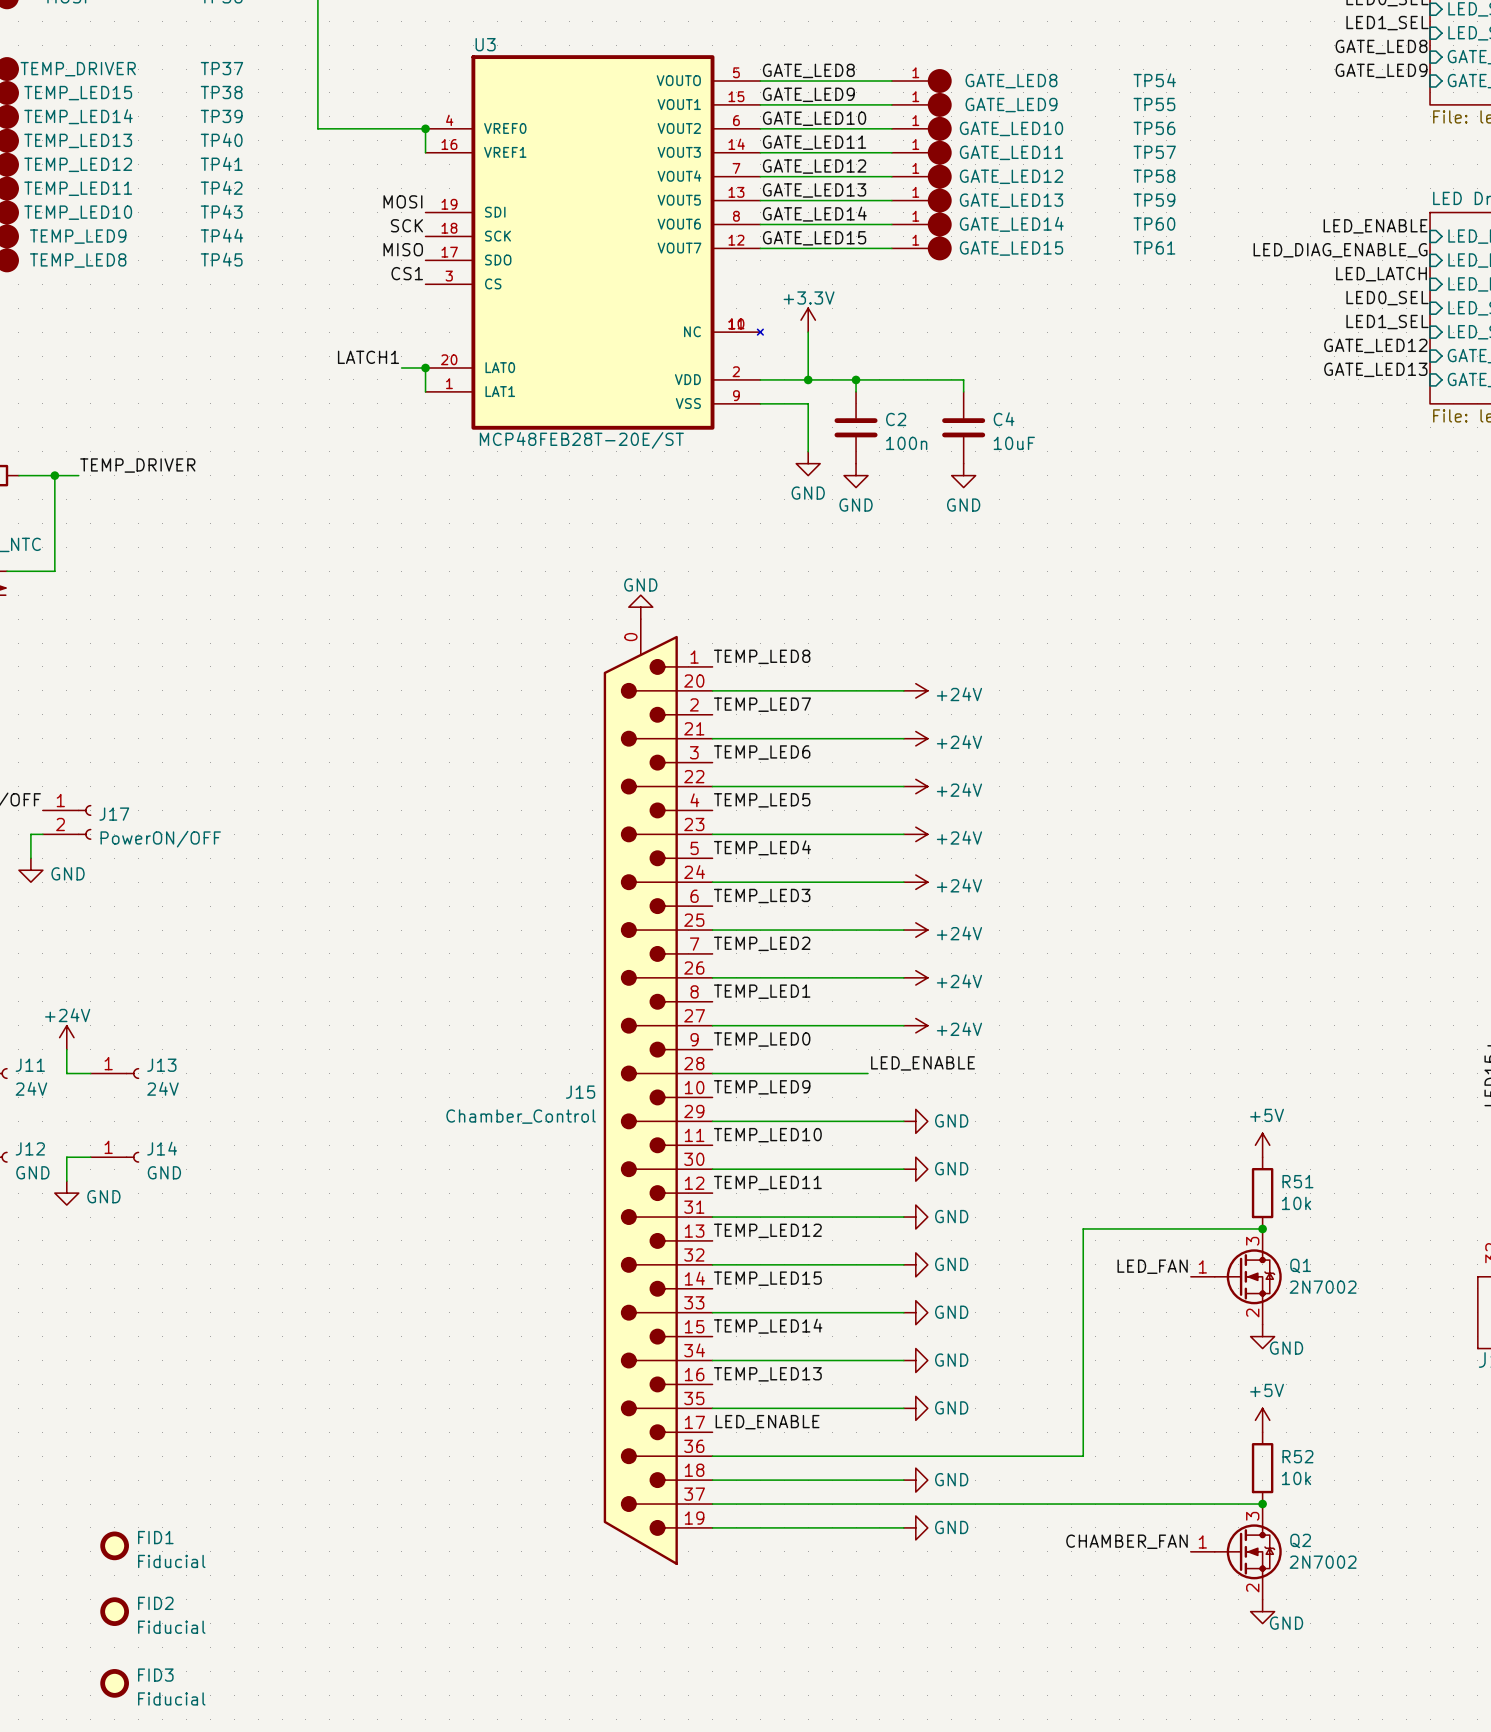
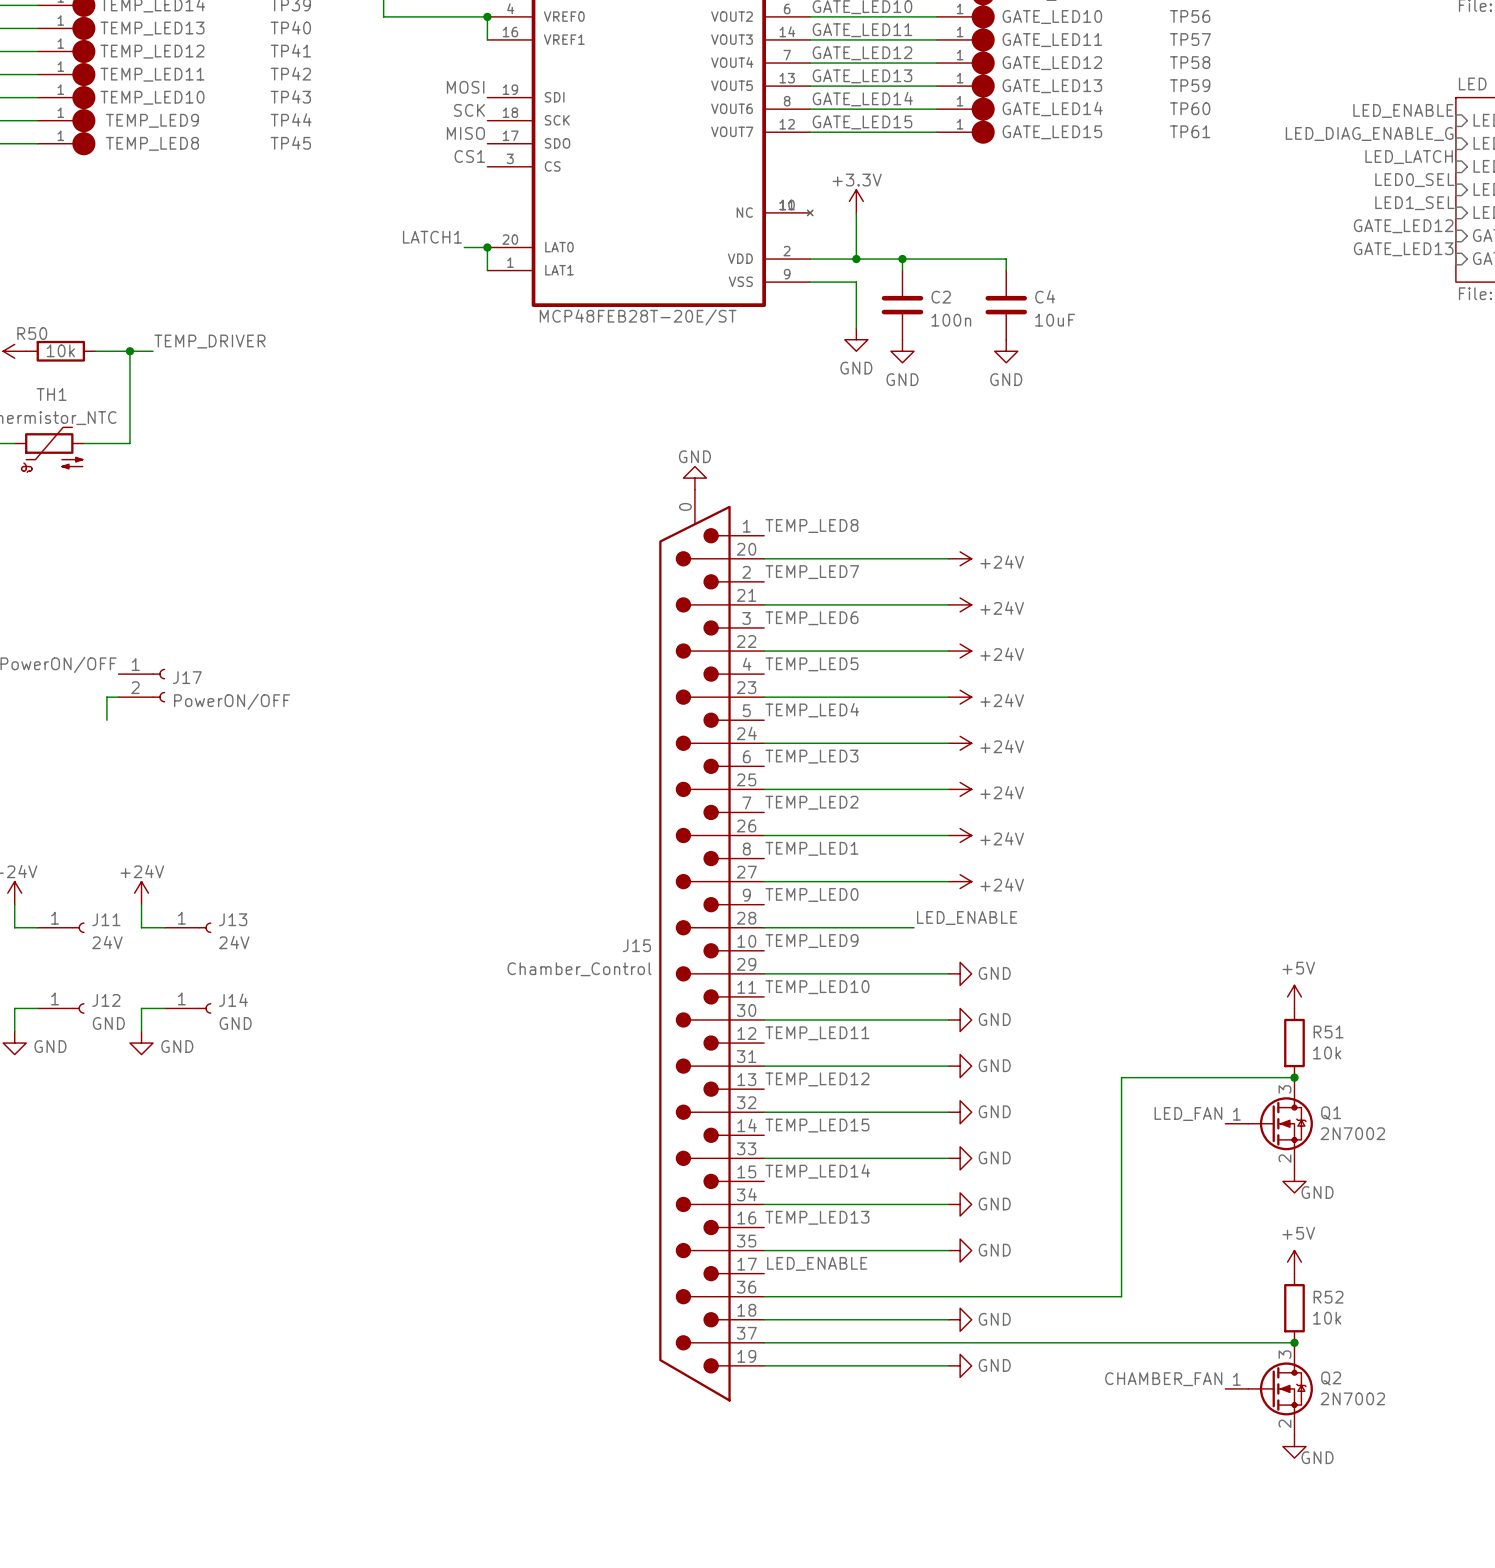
power symbol: GND (30, 870) -> none
FID1: Fiducial (114, 1545) -> none
FID2: Fiducial (114, 1611) -> none
FID3: Fiducial (114, 1683) -> none

